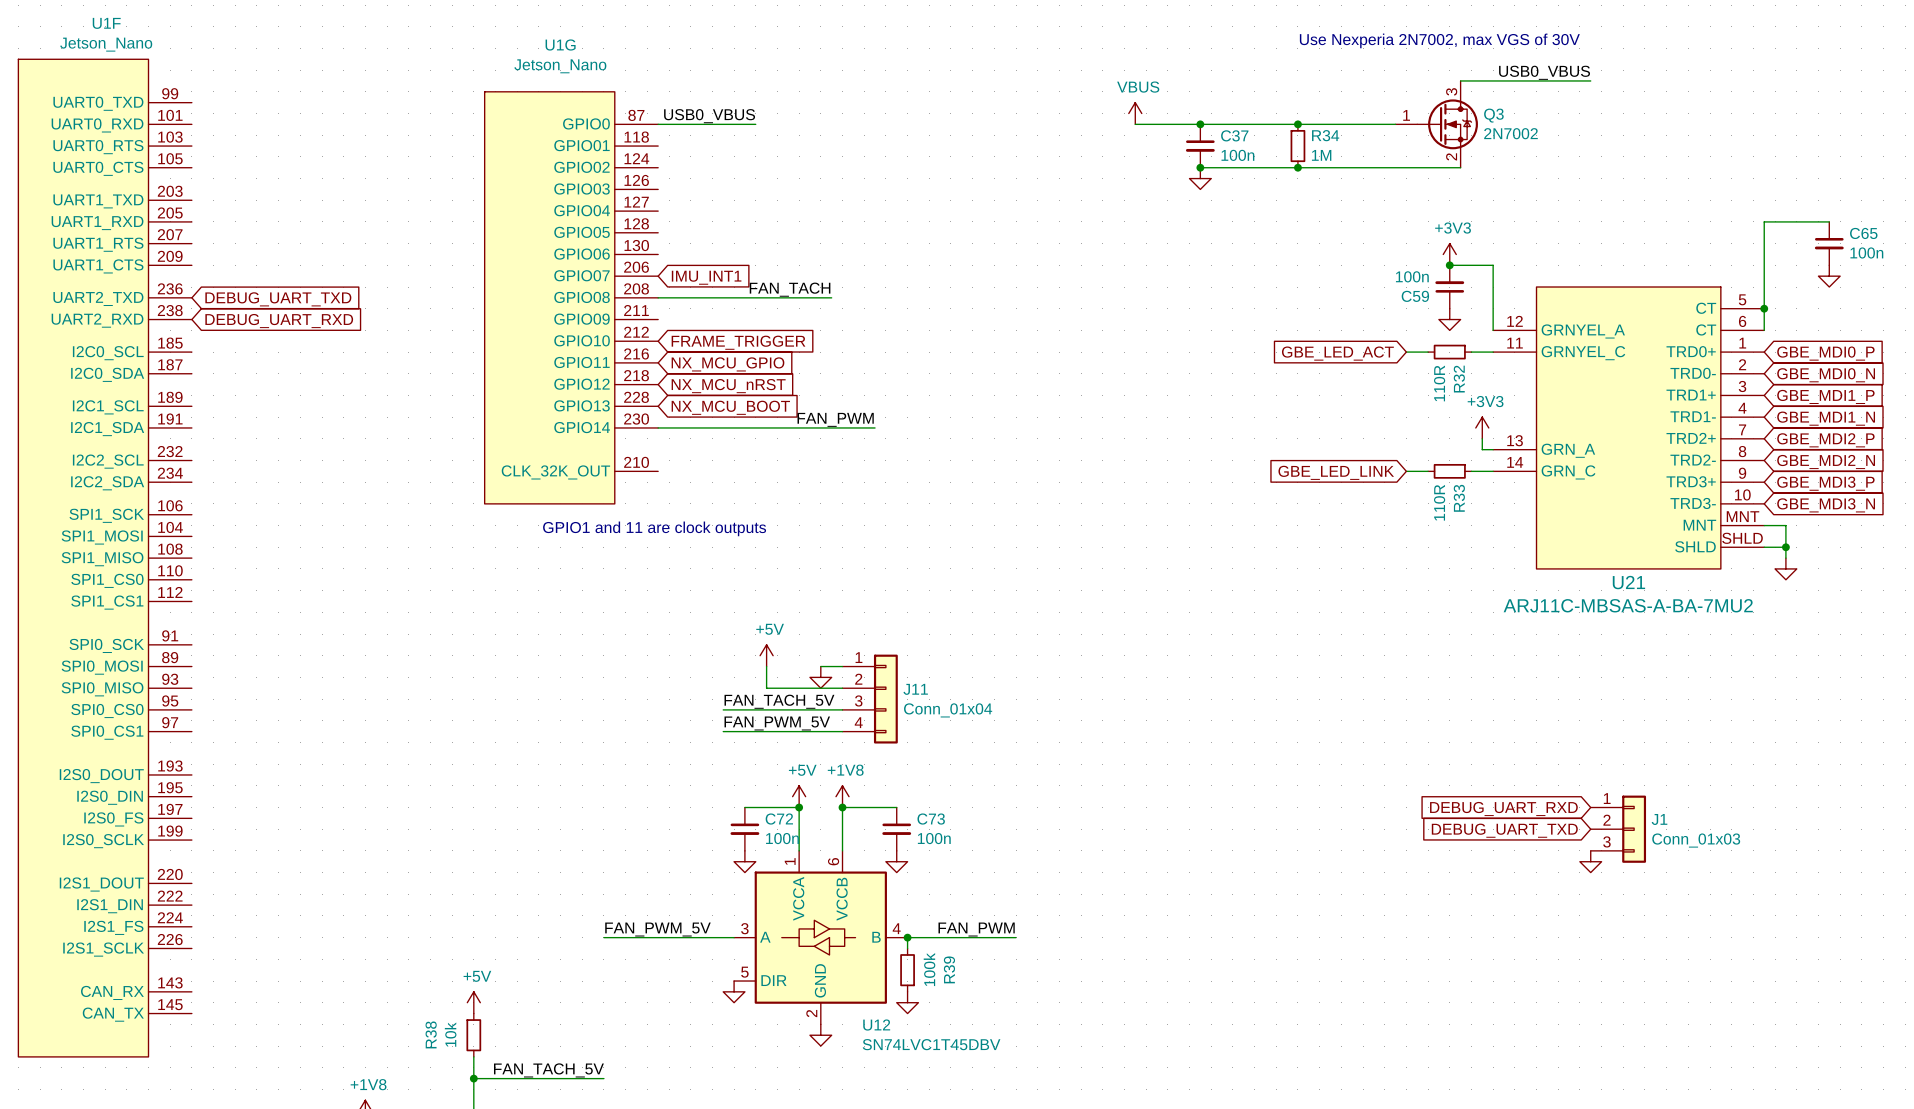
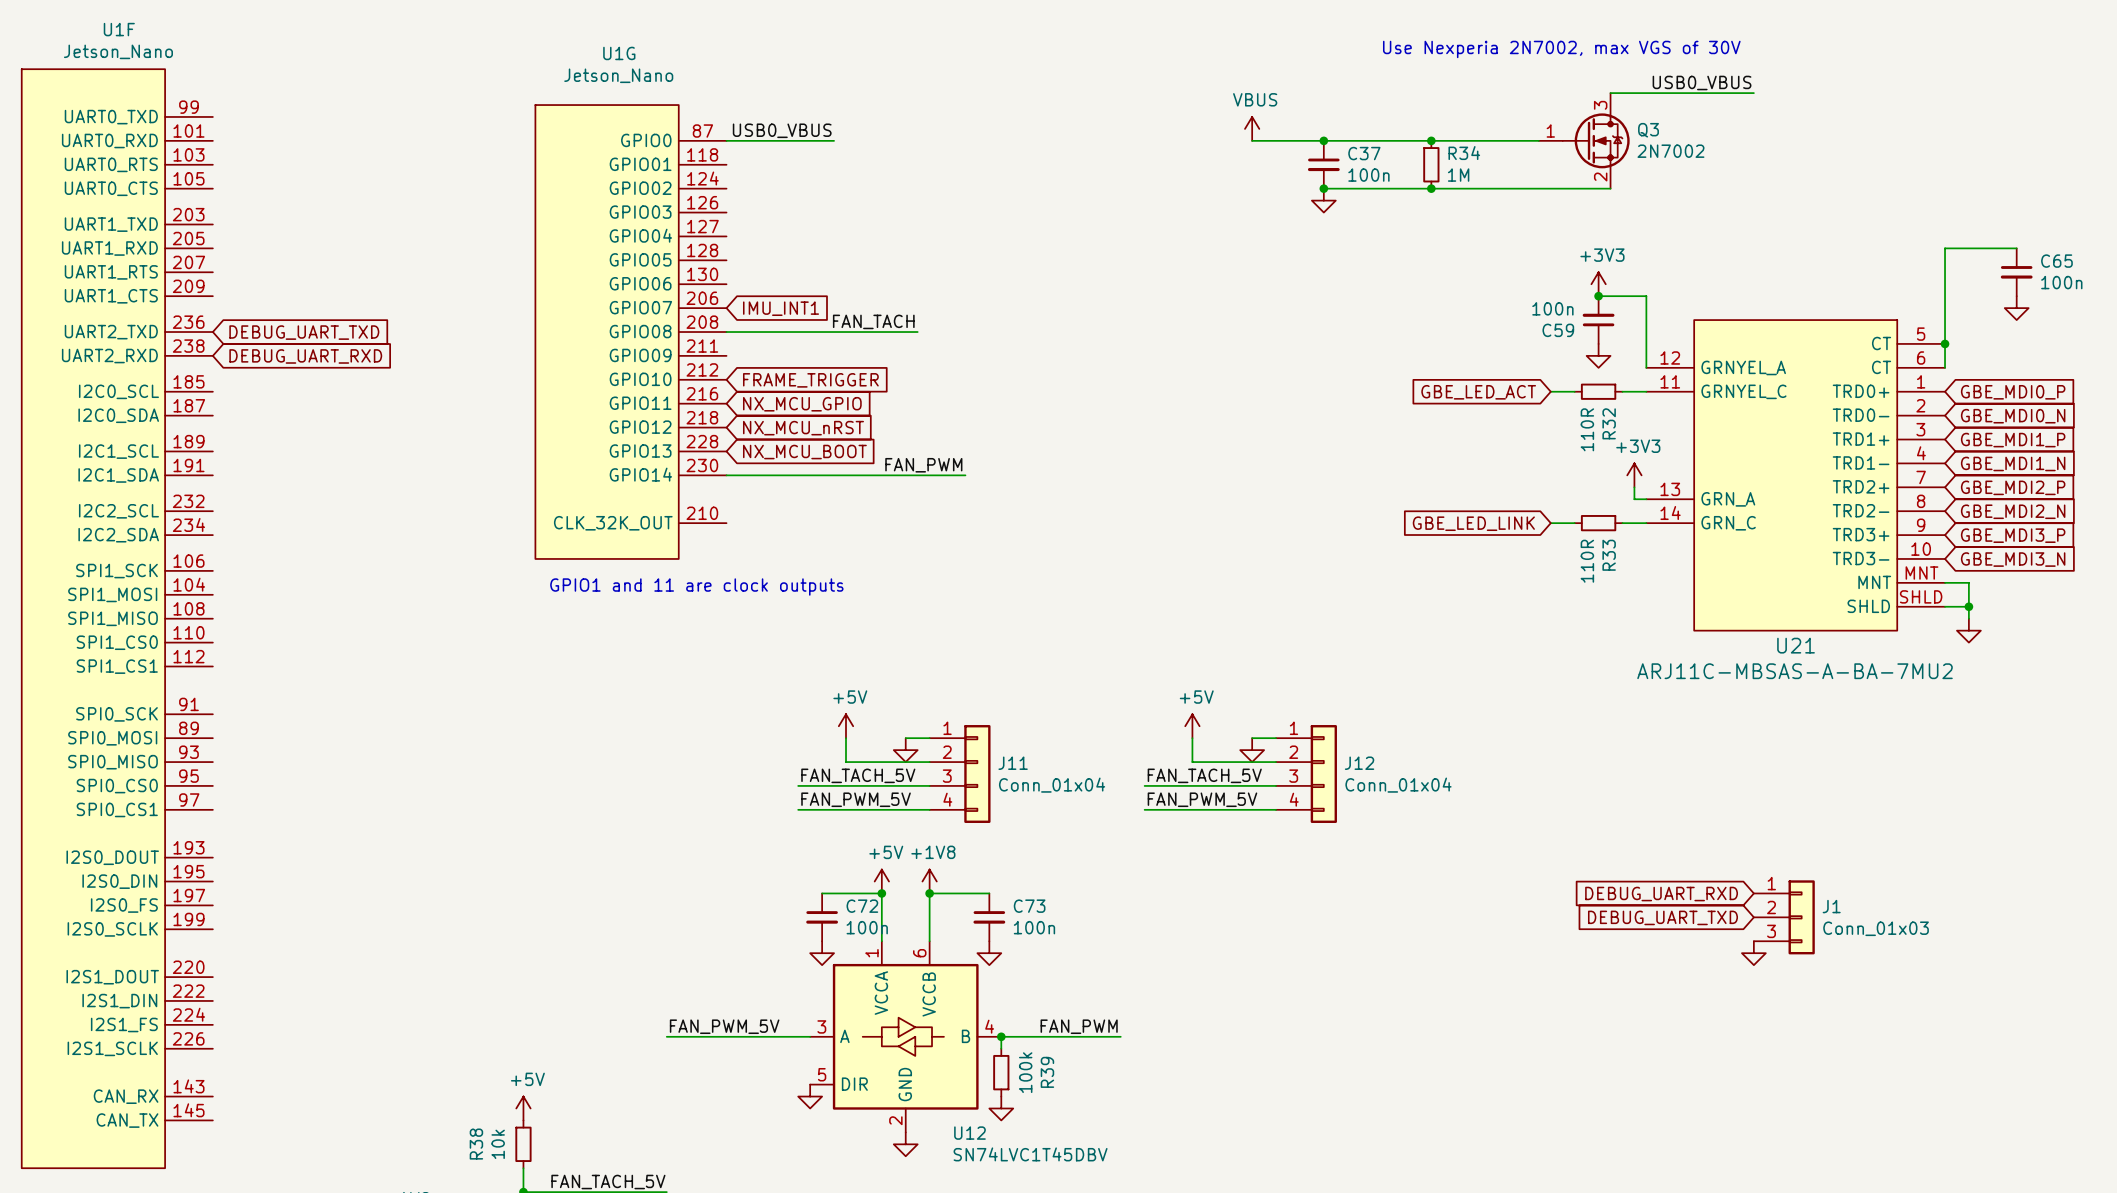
power symbol: none -> +5V (1192, 726)
wire: none -> (1192, 738) (1192, 762) (1276, 762)
wire: none -> (1252, 738) (1276, 738)
power symbol: none -> (1252, 750)
J12: none -> Conn_01x04 (1306, 774)
label: none -> FAN_TACH_5V (1204, 775)
wire: none -> (1144, 785) (1276, 785)
label: none -> FAN_PWM_5V (1202, 799)
wire: none -> (1144, 809) (1276, 809)

